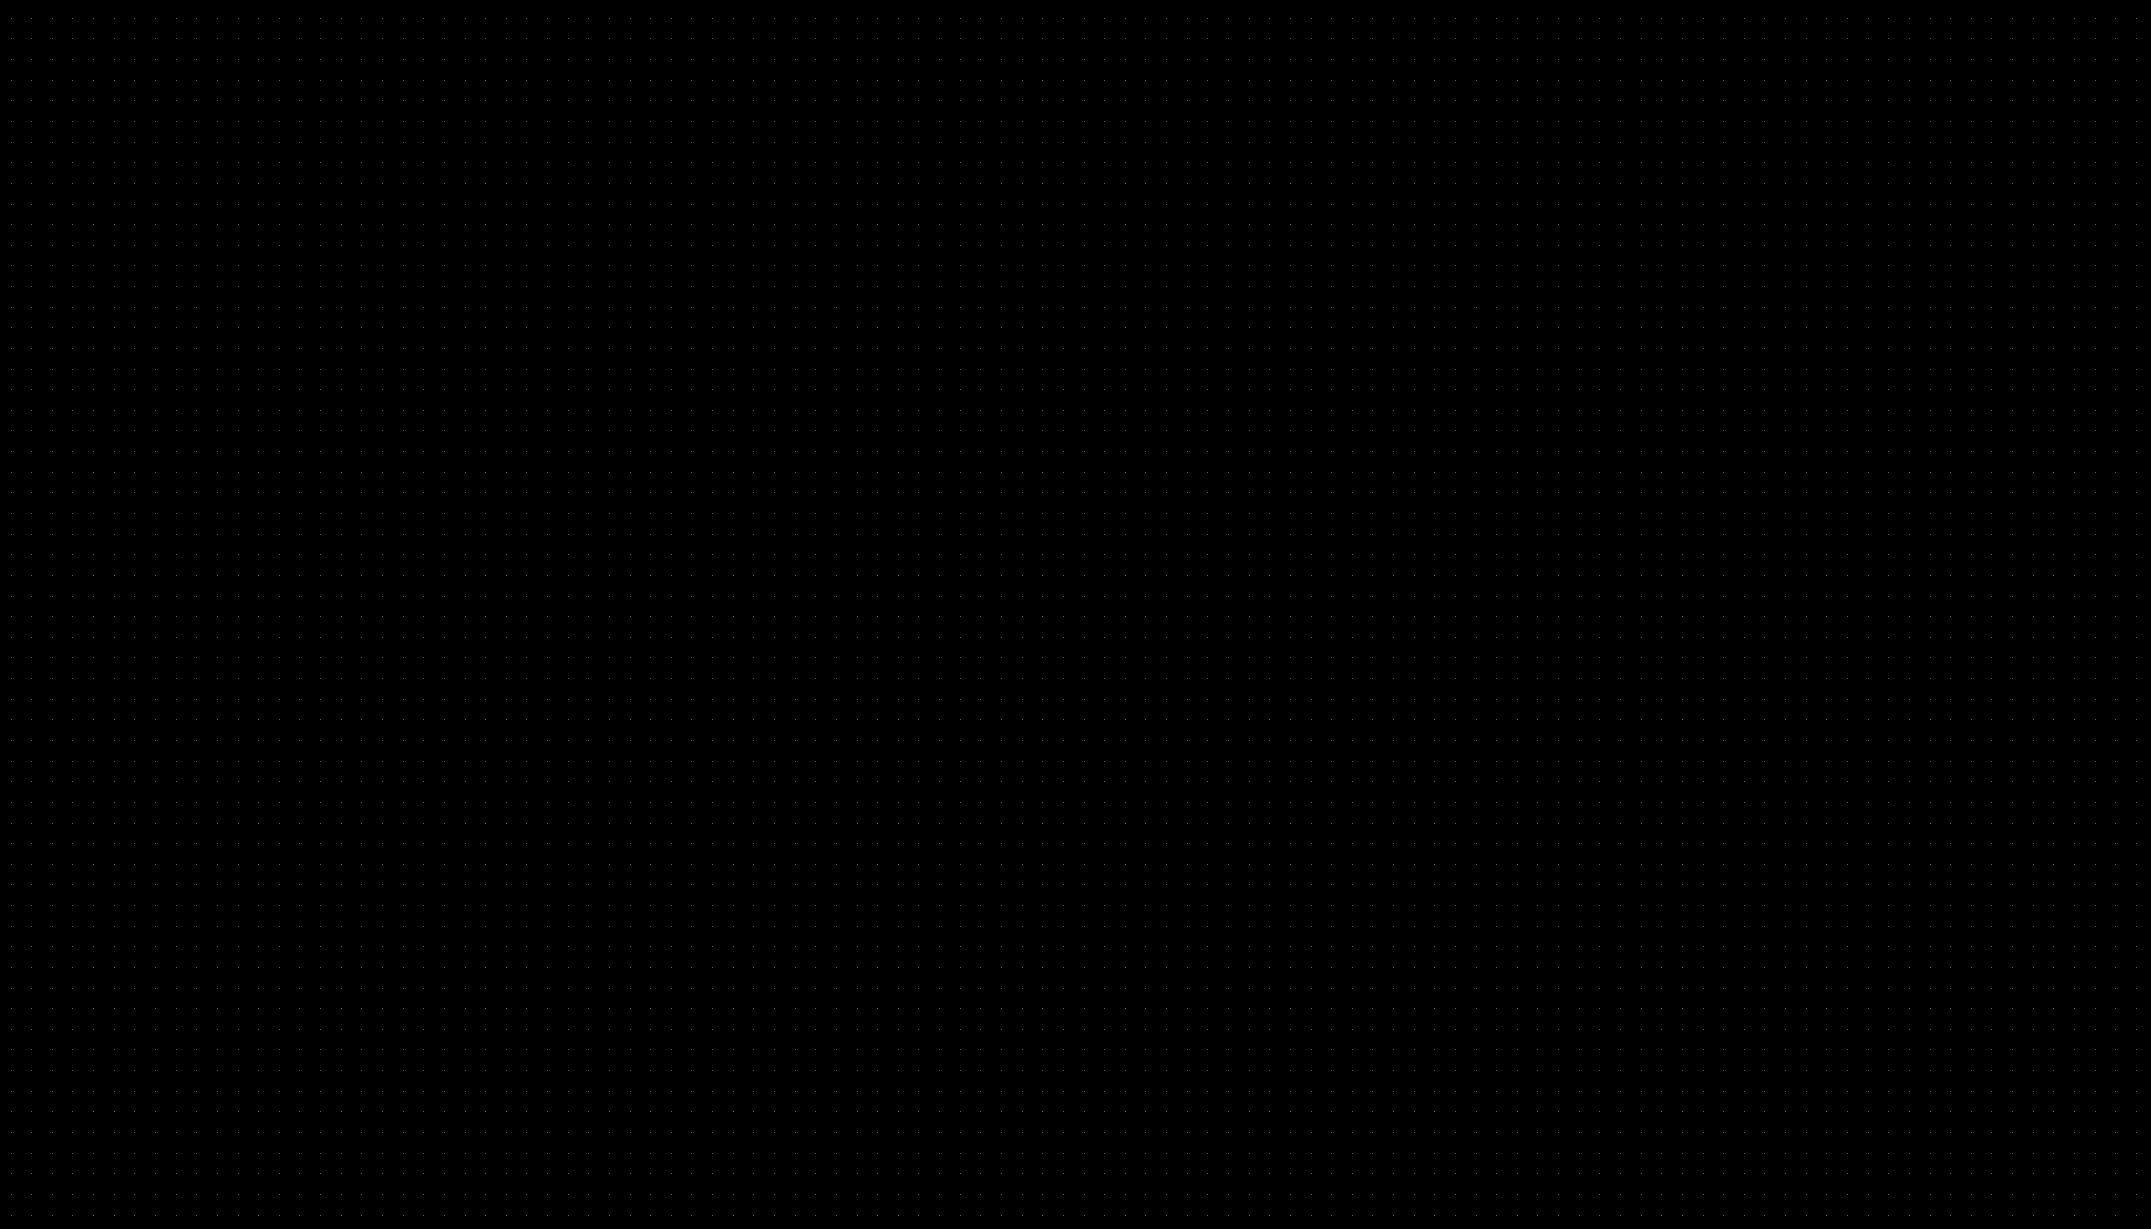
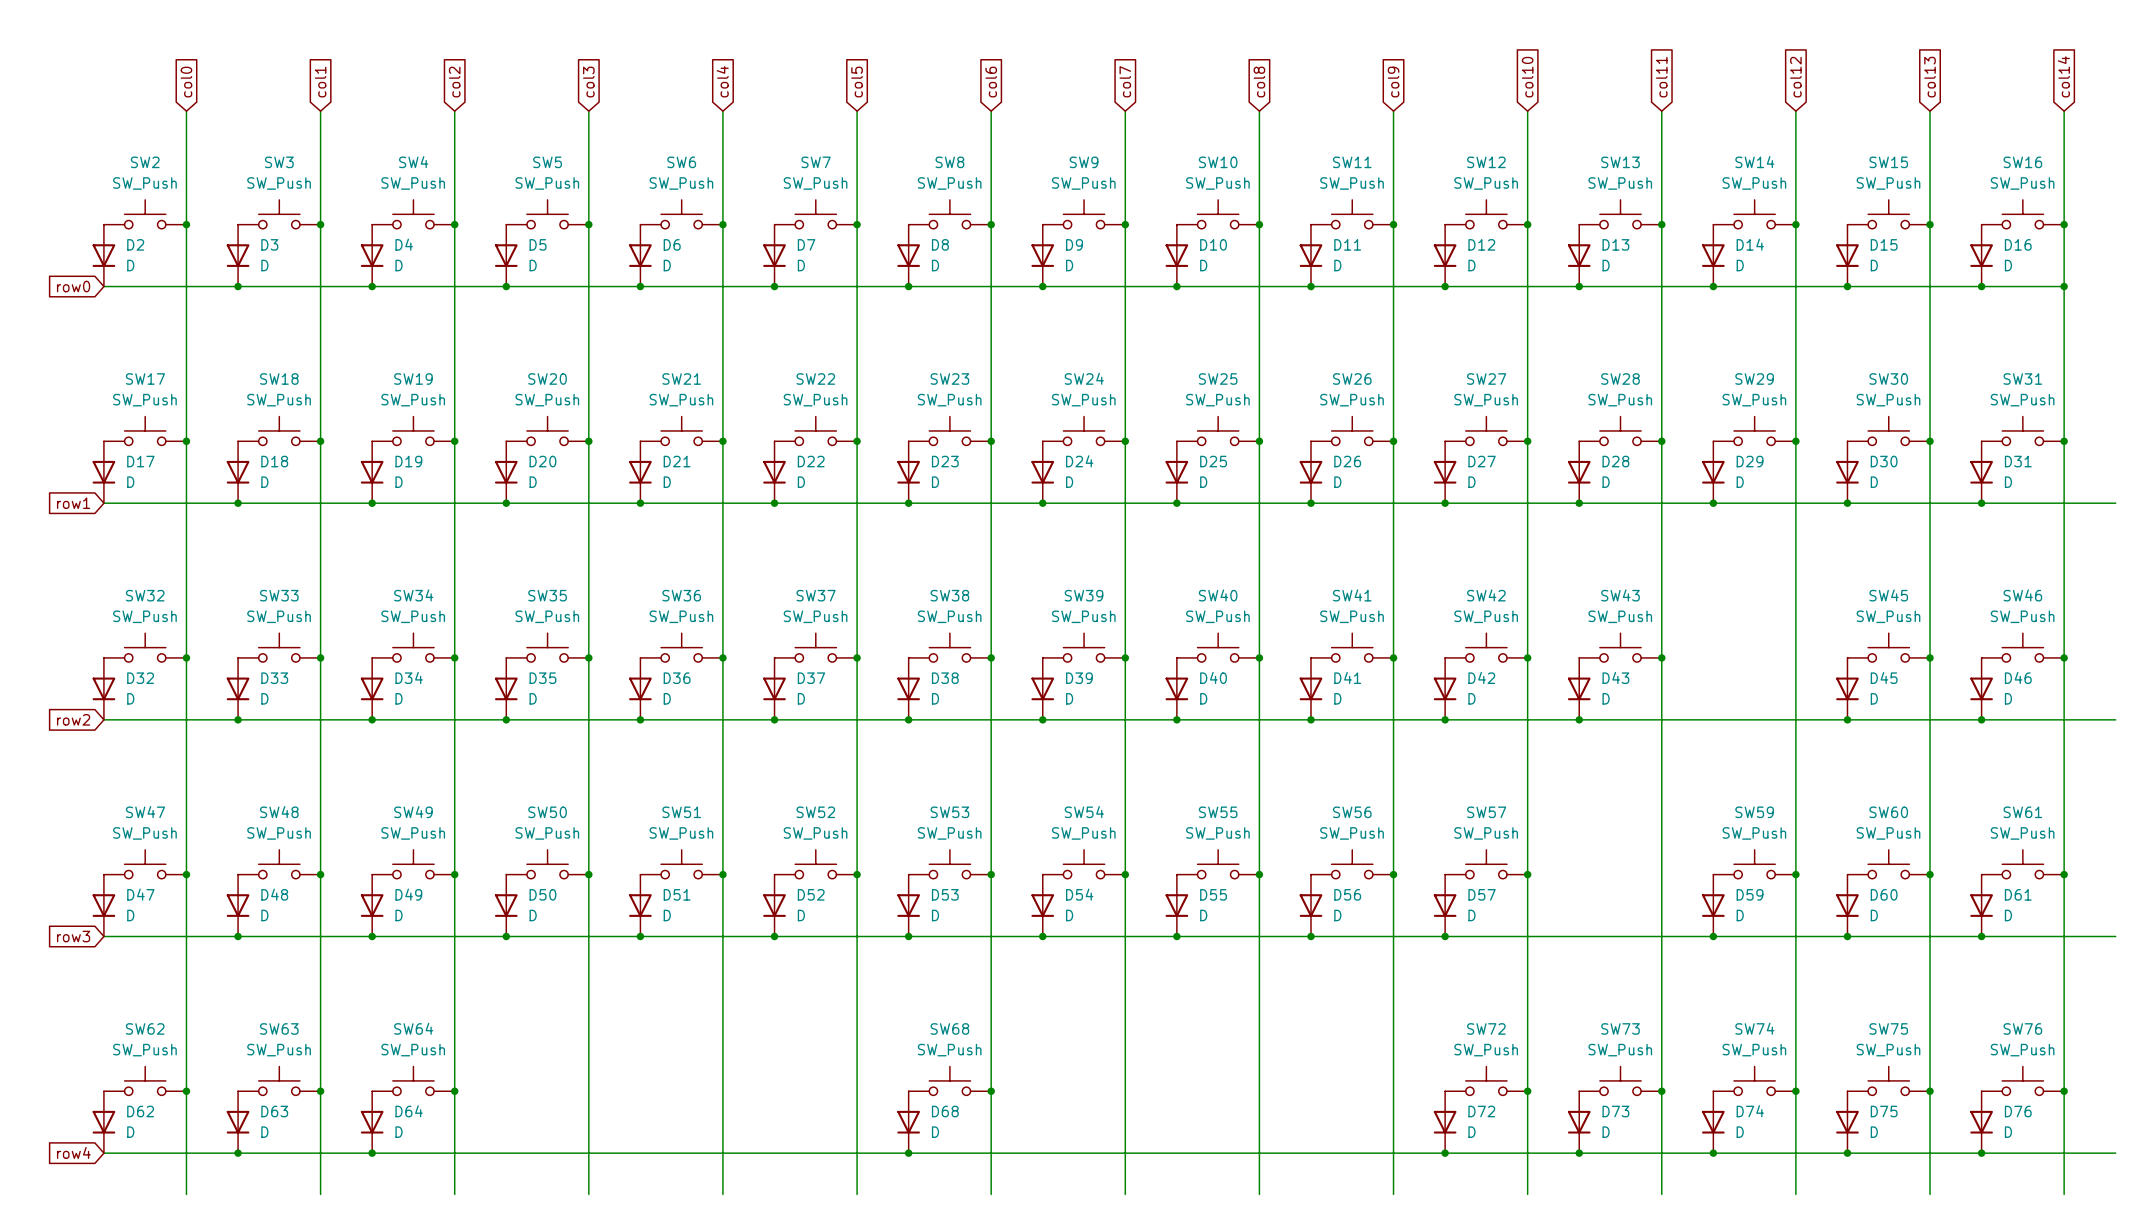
global label: none -> col14 (2063, 76)
global label: none -> col10 (1527, 77)
global label: none -> col11 (1661, 77)
global label: none -> col12 (1795, 77)
global label: none -> col13 (1930, 77)
global label: none -> col4 (722, 81)
global label: none -> col7 (1125, 81)
global label: none -> col0 (186, 82)
global label: none -> col1 (320, 82)
global label: none -> col2 (454, 82)
global label: none -> col3 (588, 82)
global label: none -> col5 (857, 82)
global label: none -> col6 (991, 82)
global label: none -> col8 (1259, 82)
global label: none -> col9 (1393, 82)
wire: none -> (186, 111) (186, 1194)
wire: none -> (320, 111) (320, 1194)
wire: none -> (454, 111) (454, 1194)
wire: none -> (588, 111) (588, 1194)
wire: none -> (722, 111) (722, 1194)
wire: none -> (857, 111) (857, 1194)
wire: none -> (991, 111) (991, 1194)
wire: none -> (1125, 111) (1125, 1194)
wire: none -> (1259, 111) (1259, 1194)
wire: none -> (1393, 111) (1393, 1194)
wire: none -> (1527, 111) (1527, 1194)
wire: none -> (1661, 111) (1661, 1194)
wire: none -> (1795, 111) (1795, 1194)
wire: none -> (1930, 111) (1930, 1194)
wire: none -> (2064, 111) (2064, 1194)
SW2: none -> SW_Push (145, 214)
SW3: none -> SW_Push (279, 214)
SW4: none -> SW_Push (413, 214)
SW5: none -> SW_Push (547, 214)
SW6: none -> SW_Push (681, 214)
SW7: none -> SW_Push (815, 214)
SW8: none -> SW_Push (949, 214)
SW9: none -> SW_Push (1084, 214)
SW10: none -> SW_Push (1218, 214)
SW11: none -> SW_Push (1352, 214)
SW12: none -> SW_Push (1486, 214)
SW13: none -> SW_Push (1620, 214)
SW14: none -> SW_Push (1754, 214)
SW15: none -> SW_Push (1888, 214)
SW16: none -> SW_Push (2022, 214)
junction: none -> (186, 224)
junction: none -> (320, 224)
junction: none -> (454, 224)
junction: none -> (588, 224)
junction: none -> (722, 224)
junction: none -> (857, 224)
junction: none -> (991, 224)
junction: none -> (1125, 224)
junction: none -> (1259, 224)
junction: none -> (1393, 224)
junction: none -> (1527, 224)
junction: none -> (1661, 224)
junction: none -> (1795, 224)
junction: none -> (1930, 224)
junction: none -> (2064, 224)
D2: none -> D (103, 255)
D3: none -> D (238, 255)
D4: none -> D (372, 255)
D5: none -> D (506, 255)
D6: none -> D (640, 255)
D7: none -> D (774, 255)
D8: none -> D (908, 255)
D9: none -> D (1042, 255)
D10: none -> D (1176, 255)
D11: none -> D (1311, 255)
D12: none -> D (1445, 255)
D13: none -> D (1579, 255)
D14: none -> D (1713, 255)
D15: none -> D (1847, 255)
D16: none -> D (1981, 255)
global label: none -> row0 (73, 286)
wire: none -> (103, 286) (2064, 286)
junction: none -> (238, 286)
junction: none -> (372, 286)
junction: none -> (506, 286)
junction: none -> (640, 286)
junction: none -> (774, 286)
junction: none -> (908, 286)
junction: none -> (1042, 286)
junction: none -> (1176, 286)
junction: none -> (1311, 286)
junction: none -> (1445, 286)
junction: none -> (1579, 286)
junction: none -> (1713, 286)
junction: none -> (1847, 286)
junction: none -> (1981, 286)
junction: none -> (2064, 286)
SW17: none -> SW_Push (145, 430)
SW18: none -> SW_Push (279, 430)
SW19: none -> SW_Push (413, 430)
SW20: none -> SW_Push (547, 430)
SW21: none -> SW_Push (681, 430)
SW22: none -> SW_Push (815, 430)
SW23: none -> SW_Push (949, 430)
SW24: none -> SW_Push (1084, 430)
SW25: none -> SW_Push (1218, 430)
SW26: none -> SW_Push (1352, 430)
SW27: none -> SW_Push (1486, 430)
SW28: none -> SW_Push (1620, 430)
SW29: none -> SW_Push (1754, 430)
SW30: none -> SW_Push (1888, 430)
SW31: none -> SW_Push (2022, 430)
junction: none -> (186, 441)
junction: none -> (320, 441)
junction: none -> (454, 441)
junction: none -> (588, 441)
junction: none -> (722, 441)
junction: none -> (857, 441)
junction: none -> (991, 441)
junction: none -> (1125, 441)
junction: none -> (1259, 441)
junction: none -> (1393, 441)
junction: none -> (1527, 441)
junction: none -> (1661, 441)
junction: none -> (1795, 441)
junction: none -> (1930, 441)
junction: none -> (2064, 441)
D17: none -> D (103, 472)
D18: none -> D (238, 472)
D19: none -> D (372, 472)
D20: none -> D (506, 472)
D21: none -> D (640, 472)
D22: none -> D (774, 472)
D23: none -> D (908, 472)
D24: none -> D (1042, 472)
D25: none -> D (1176, 472)
D26: none -> D (1311, 472)
D27: none -> D (1445, 472)
D28: none -> D (1579, 472)
D29: none -> D (1713, 472)
D30: none -> D (1847, 472)
D31: none -> D (1981, 472)
global label: none -> row1 (73, 503)
wire: none -> (103, 503) (2115, 503)
junction: none -> (238, 503)
junction: none -> (372, 503)
junction: none -> (506, 503)
junction: none -> (640, 503)
junction: none -> (774, 503)
junction: none -> (908, 503)
junction: none -> (1042, 503)
junction: none -> (1176, 503)
junction: none -> (1311, 503)
junction: none -> (1445, 503)
junction: none -> (1579, 503)
junction: none -> (1713, 503)
junction: none -> (1847, 503)
junction: none -> (1981, 503)
SW32: none -> SW_Push (145, 647)
SW33: none -> SW_Push (279, 647)
SW34: none -> SW_Push (413, 647)
SW35: none -> SW_Push (547, 647)
SW36: none -> SW_Push (681, 647)
SW37: none -> SW_Push (815, 647)
SW38: none -> SW_Push (949, 647)
SW39: none -> SW_Push (1084, 647)
SW40: none -> SW_Push (1218, 647)
SW41: none -> SW_Push (1352, 647)
SW42: none -> SW_Push (1486, 647)
SW43: none -> SW_Push (1620, 647)
SW45: none -> SW_Push (1888, 647)
SW46: none -> SW_Push (2022, 647)
junction: none -> (186, 657)
junction: none -> (320, 657)
junction: none -> (454, 657)
junction: none -> (588, 657)
junction: none -> (722, 657)
junction: none -> (857, 657)
junction: none -> (991, 657)
junction: none -> (1125, 657)
junction: none -> (1259, 657)
junction: none -> (1393, 657)
junction: none -> (1527, 657)
junction: none -> (1661, 657)
junction: none -> (1930, 657)
junction: none -> (2064, 657)
D32: none -> D (103, 688)
D33: none -> D (238, 688)
D34: none -> D (372, 688)
D35: none -> D (506, 688)
D36: none -> D (640, 688)
D37: none -> D (774, 688)
D38: none -> D (908, 688)
D39: none -> D (1042, 688)
D40: none -> D (1176, 688)
D41: none -> D (1311, 688)
D42: none -> D (1445, 688)
D43: none -> D (1579, 688)
D45: none -> D (1847, 688)
D46: none -> D (1981, 688)
global label: none -> row2 (73, 719)
wire: none -> (103, 719) (2115, 719)
junction: none -> (238, 719)
junction: none -> (372, 719)
junction: none -> (506, 719)
junction: none -> (640, 719)
junction: none -> (774, 719)
junction: none -> (908, 719)
junction: none -> (1042, 719)
junction: none -> (1176, 719)
junction: none -> (1311, 719)
junction: none -> (1445, 719)
junction: none -> (1579, 719)
junction: none -> (1847, 719)
junction: none -> (1981, 719)
SW47: none -> SW_Push (145, 864)
SW48: none -> SW_Push (279, 864)
SW49: none -> SW_Push (413, 864)
SW50: none -> SW_Push (547, 864)
SW51: none -> SW_Push (681, 864)
SW52: none -> SW_Push (815, 864)
SW53: none -> SW_Push (949, 864)
SW54: none -> SW_Push (1084, 864)
SW55: none -> SW_Push (1218, 864)
SW56: none -> SW_Push (1352, 864)
SW57: none -> SW_Push (1486, 864)
SW59: none -> SW_Push (1754, 864)
SW60: none -> SW_Push (1888, 864)
SW61: none -> SW_Push (2022, 864)
junction: none -> (186, 874)
junction: none -> (320, 874)
junction: none -> (454, 874)
junction: none -> (588, 874)
junction: none -> (722, 874)
junction: none -> (857, 874)
junction: none -> (991, 874)
junction: none -> (1125, 874)
junction: none -> (1259, 874)
junction: none -> (1393, 874)
junction: none -> (1527, 874)
junction: none -> (1795, 874)
junction: none -> (1930, 874)
junction: none -> (2064, 874)
D47: none -> D (103, 905)
D48: none -> D (238, 905)
D49: none -> D (372, 905)
D50: none -> D (506, 905)
D51: none -> D (640, 905)
D52: none -> D (774, 905)
D53: none -> D (908, 905)
D54: none -> D (1042, 905)
D55: none -> D (1176, 905)
D56: none -> D (1311, 905)
D57: none -> D (1445, 905)
D59: none -> D (1713, 905)
D60: none -> D (1847, 905)
D61: none -> D (1981, 905)
global label: none -> row3 (73, 936)
wire: none -> (103, 936) (2115, 936)
junction: none -> (238, 936)
junction: none -> (372, 936)
junction: none -> (506, 936)
junction: none -> (640, 936)
junction: none -> (774, 936)
junction: none -> (908, 936)
junction: none -> (1042, 936)
junction: none -> (1176, 936)
junction: none -> (1311, 936)
junction: none -> (1445, 936)
junction: none -> (1713, 936)
junction: none -> (1847, 936)
junction: none -> (1981, 936)
SW62: none -> SW_Push (145, 1080)
SW63: none -> SW_Push (279, 1080)
SW64: none -> SW_Push (413, 1080)
SW68: none -> SW_Push (949, 1080)
SW72: none -> SW_Push (1486, 1080)
SW73: none -> SW_Push (1620, 1080)
SW74: none -> SW_Push (1754, 1080)
SW75: none -> SW_Push (1888, 1080)
SW76: none -> SW_Push (2022, 1080)
junction: none -> (186, 1091)
junction: none -> (320, 1091)
junction: none -> (454, 1091)
junction: none -> (991, 1091)
junction: none -> (1527, 1091)
junction: none -> (1661, 1091)
junction: none -> (1795, 1091)
junction: none -> (1930, 1091)
junction: none -> (2064, 1091)
D62: none -> D (103, 1122)
D63: none -> D (238, 1122)
D64: none -> D (372, 1122)
D68: none -> D (908, 1122)
D72: none -> D (1445, 1122)
D73: none -> D (1579, 1122)
D74: none -> D (1713, 1122)
D75: none -> D (1847, 1122)
D76: none -> D (1981, 1122)
global label: none -> row4 (73, 1152)
wire: none -> (103, 1153) (2115, 1153)
junction: none -> (238, 1153)
junction: none -> (372, 1153)
junction: none -> (908, 1153)
junction: none -> (1445, 1153)
junction: none -> (1579, 1153)
junction: none -> (1713, 1153)
junction: none -> (1847, 1153)
junction: none -> (1981, 1153)

